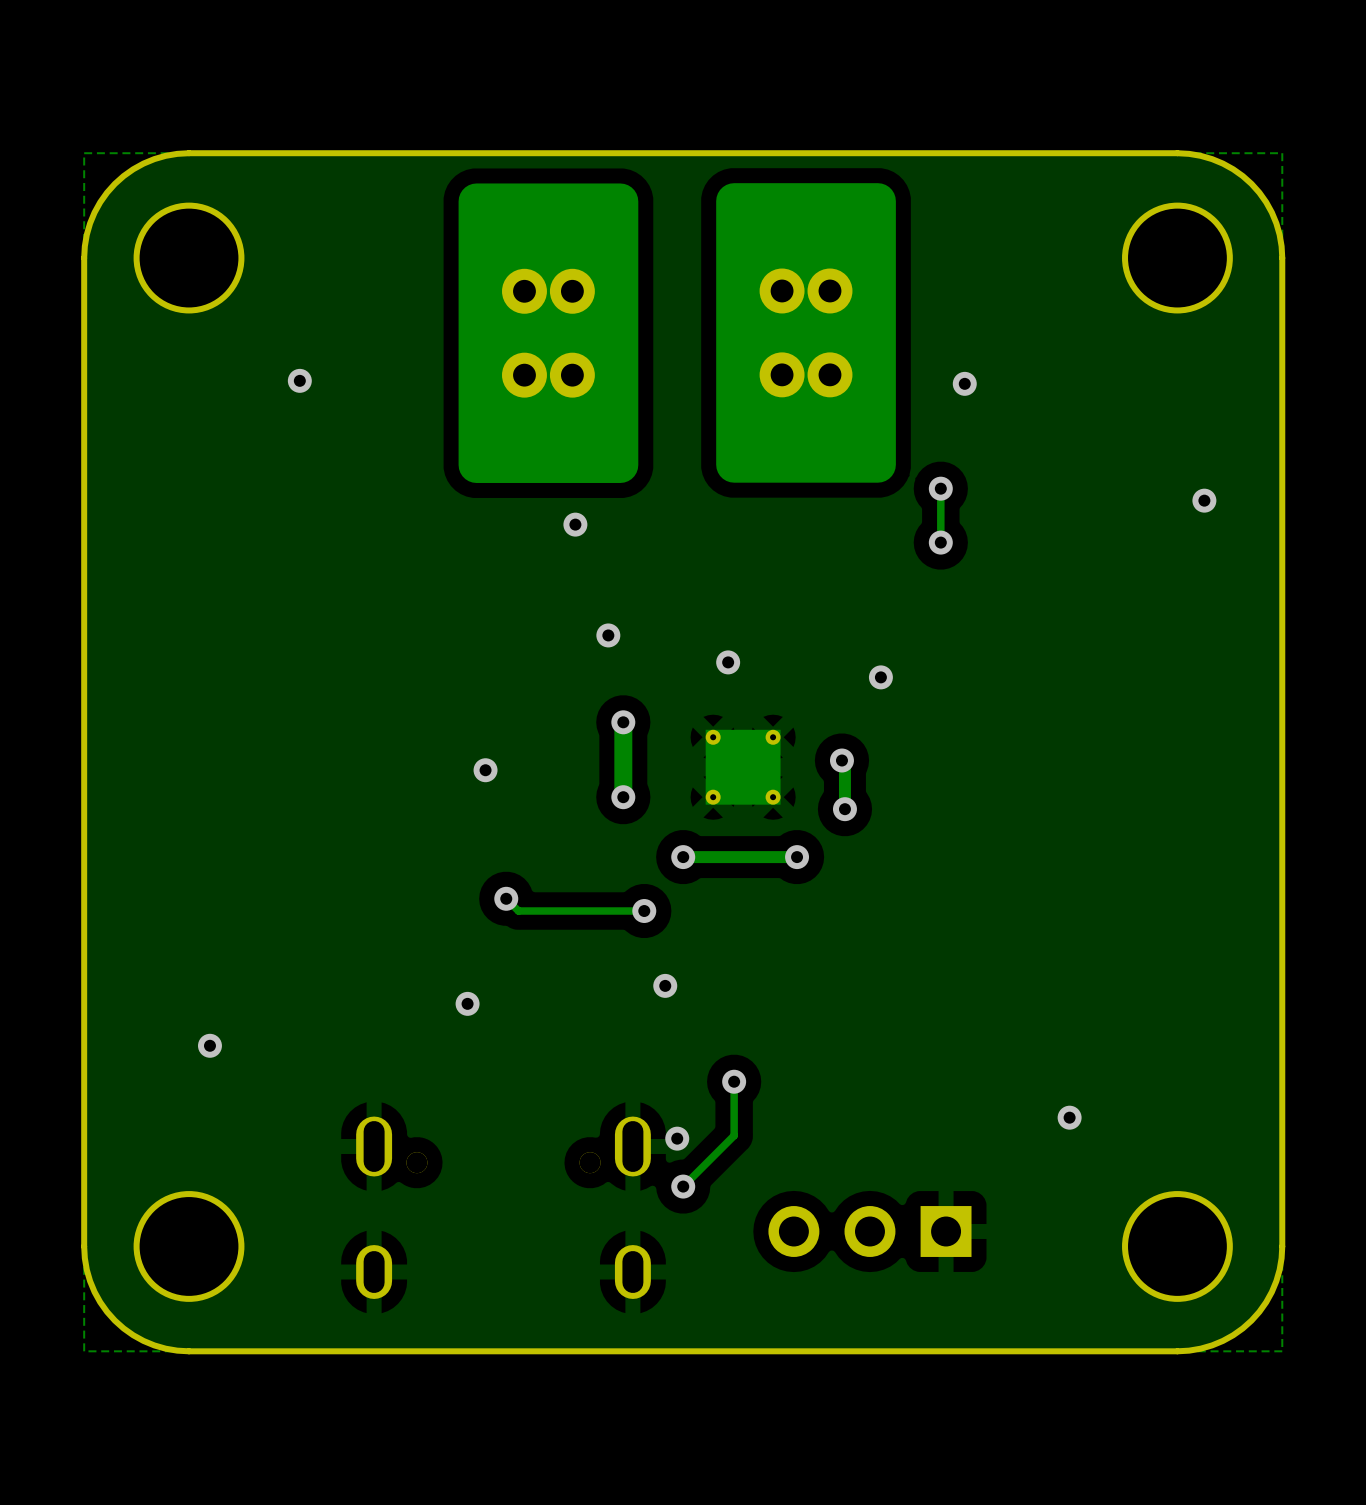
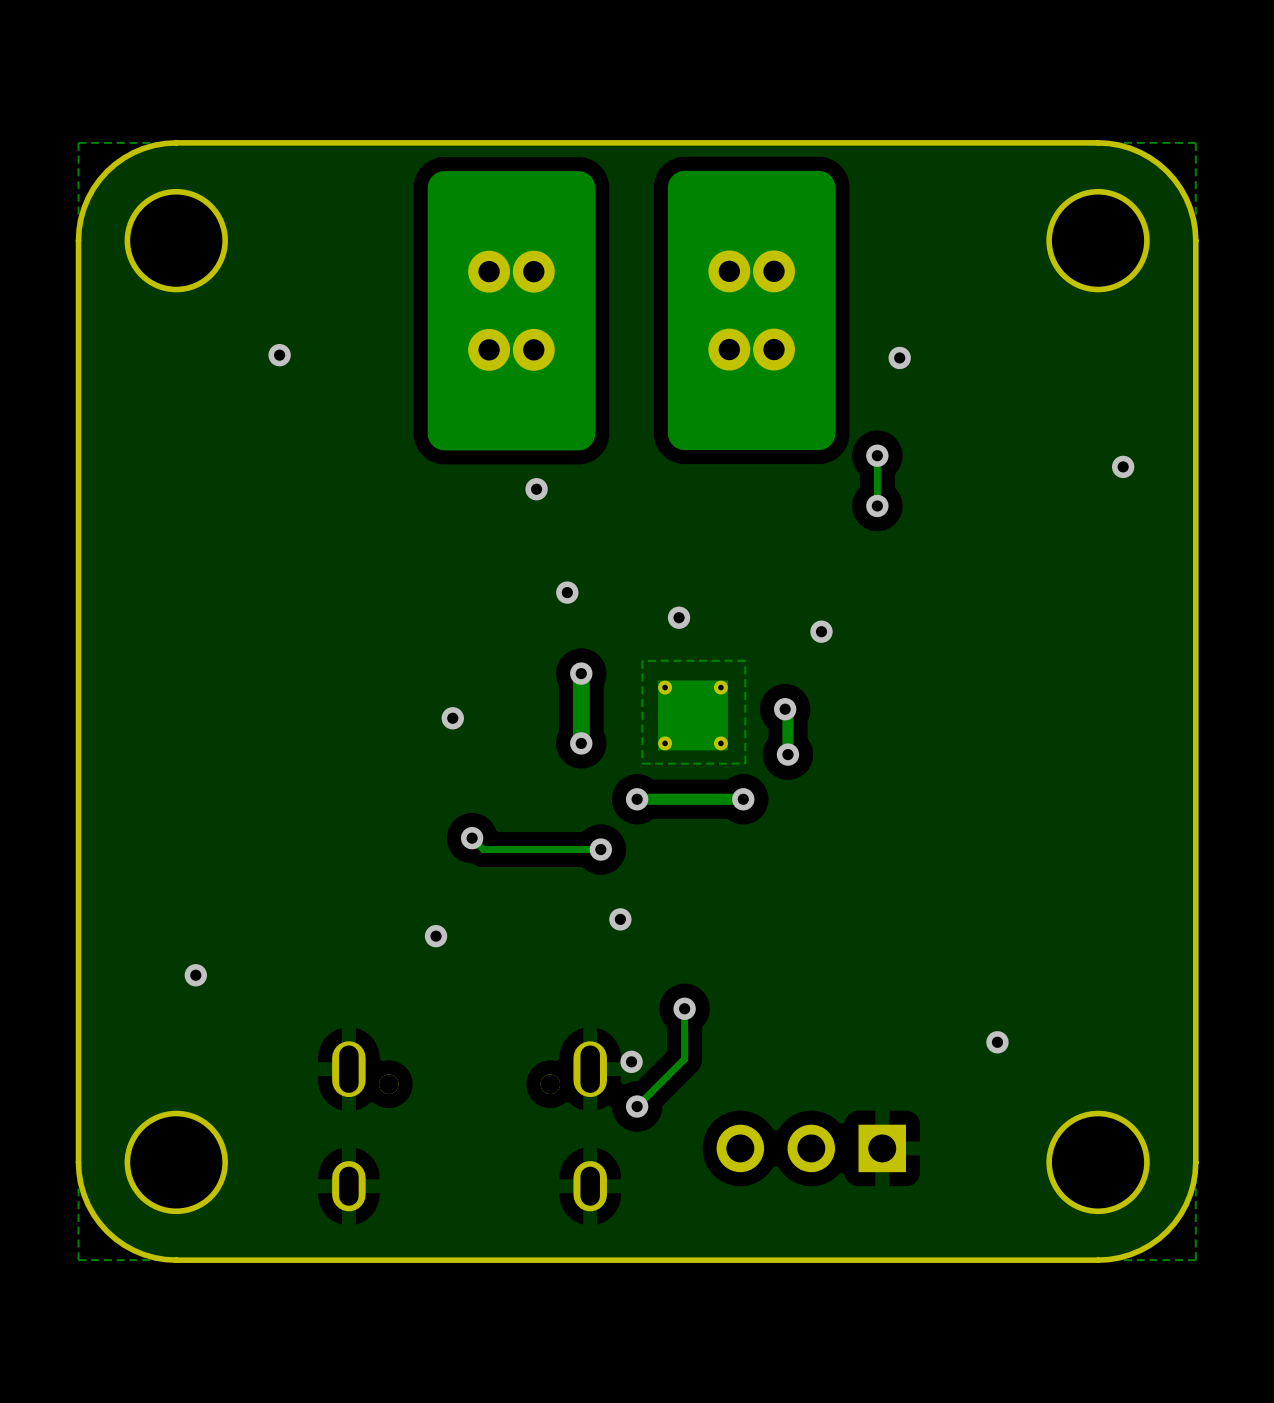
zone outline: none -> (745, 660) (642, 660) (642, 763) (745, 763) (745, 660)

